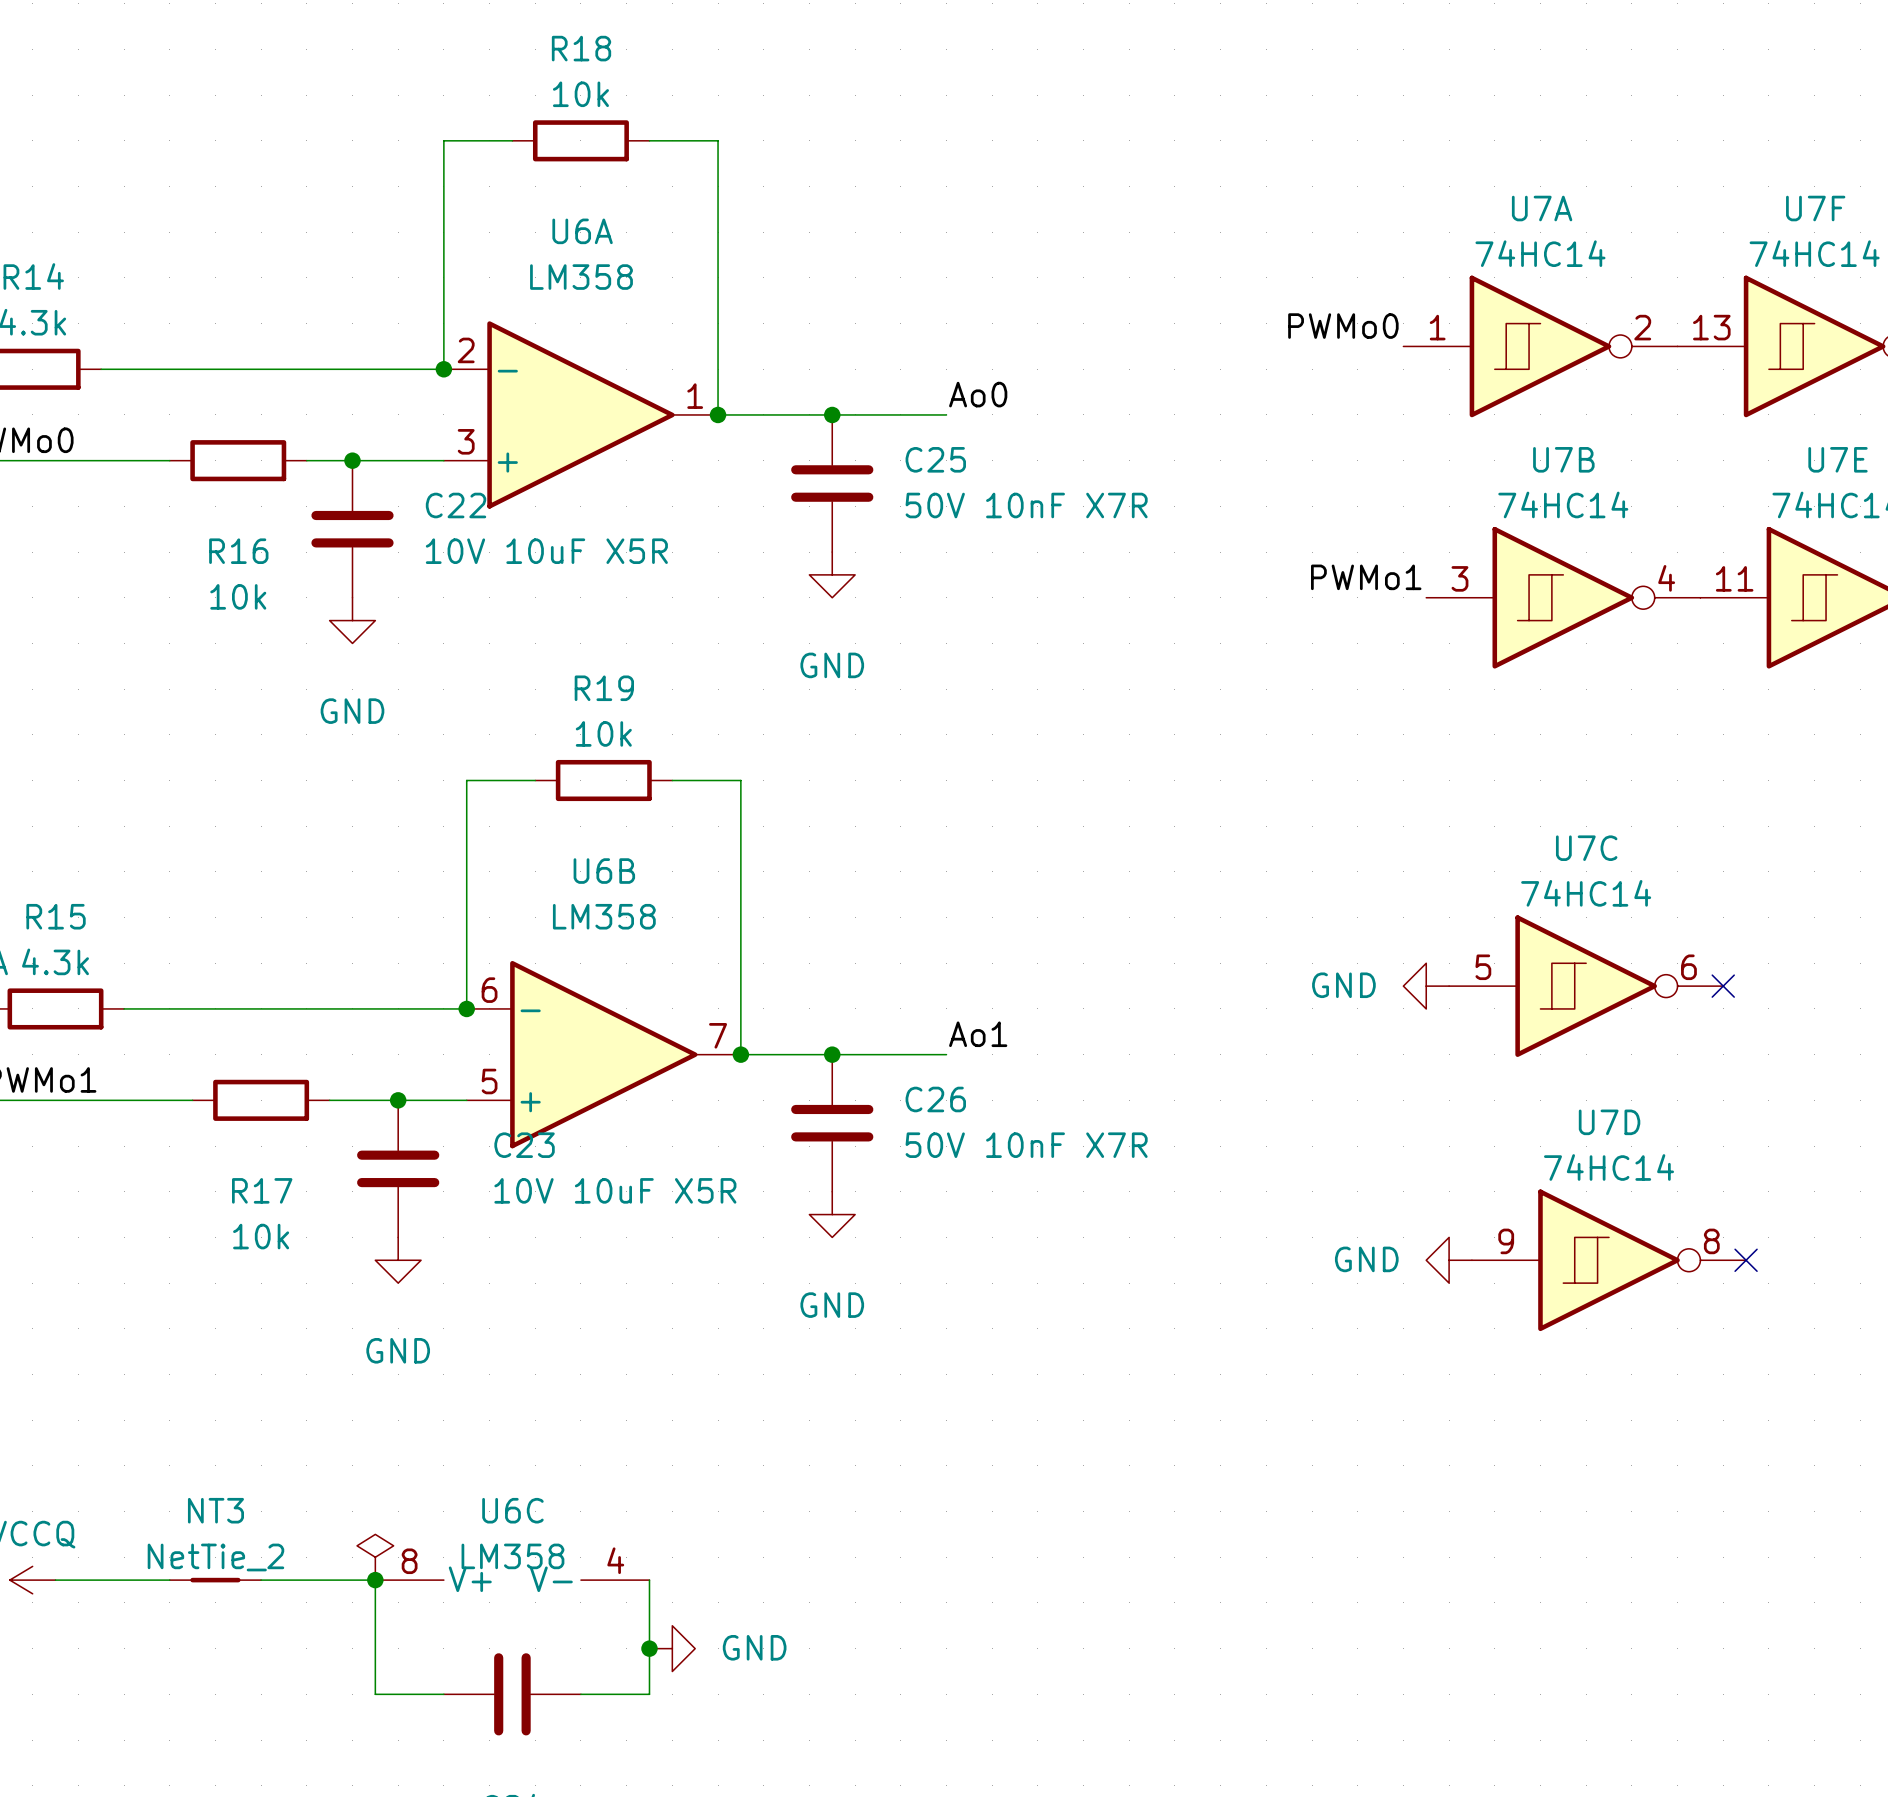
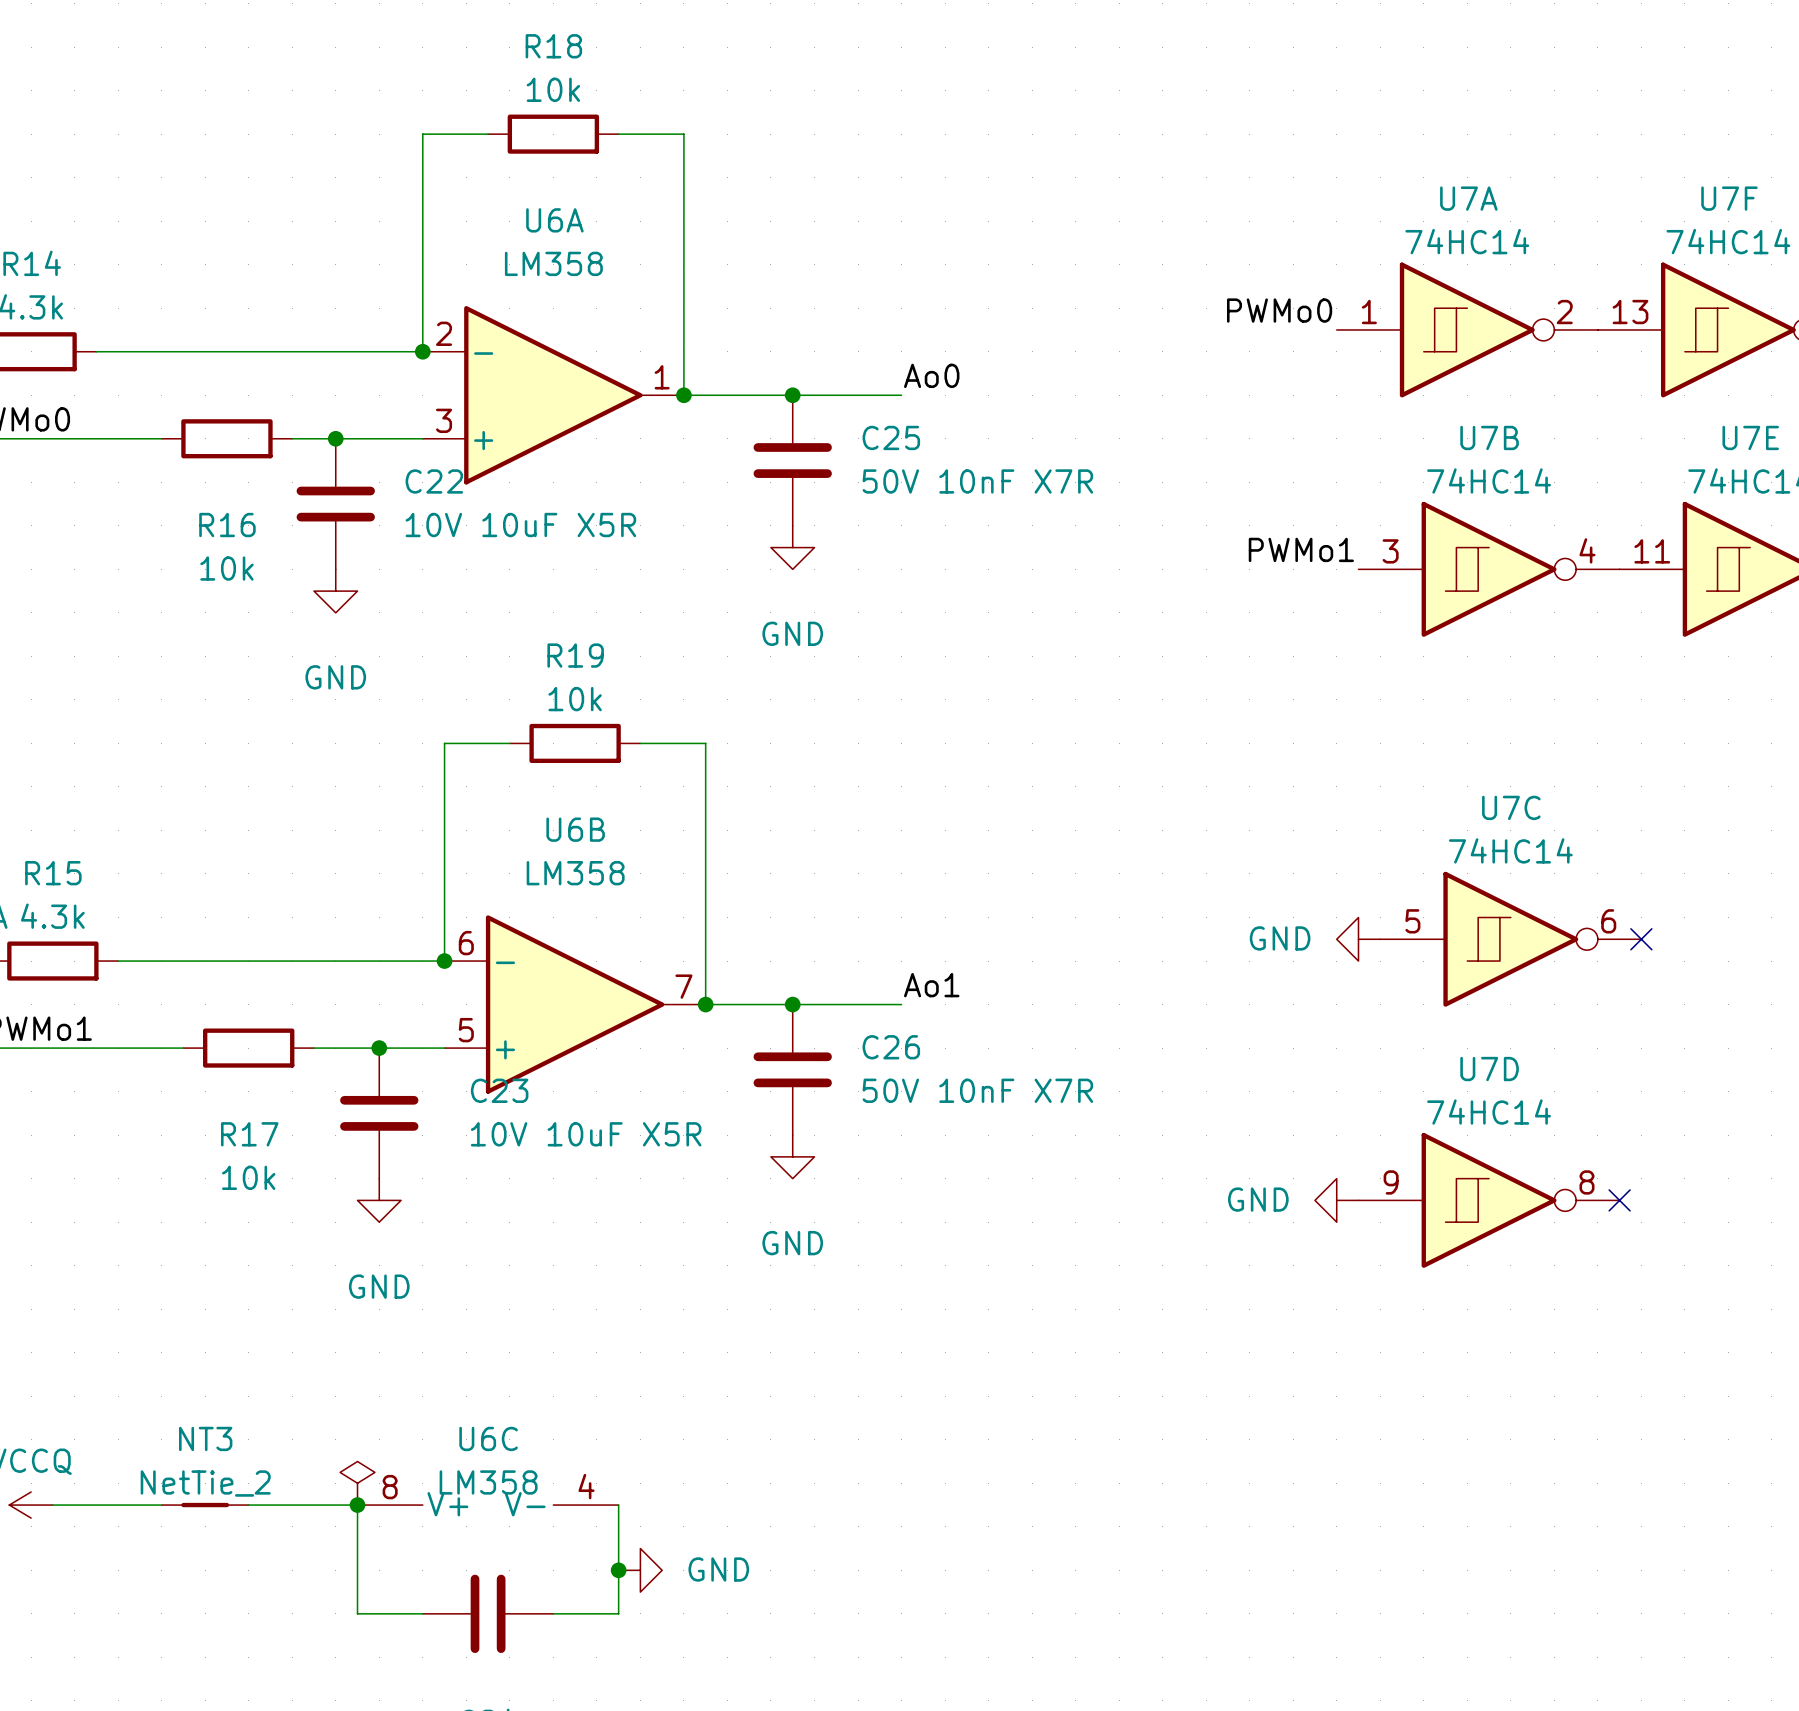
power symbol position: GND (1449, 1260) -> GND (1336, 1200)
U7D position: (1609, 1260) -> (1489, 1200)
no-connect mark position: (1746, 1260) -> (1619, 1200)

